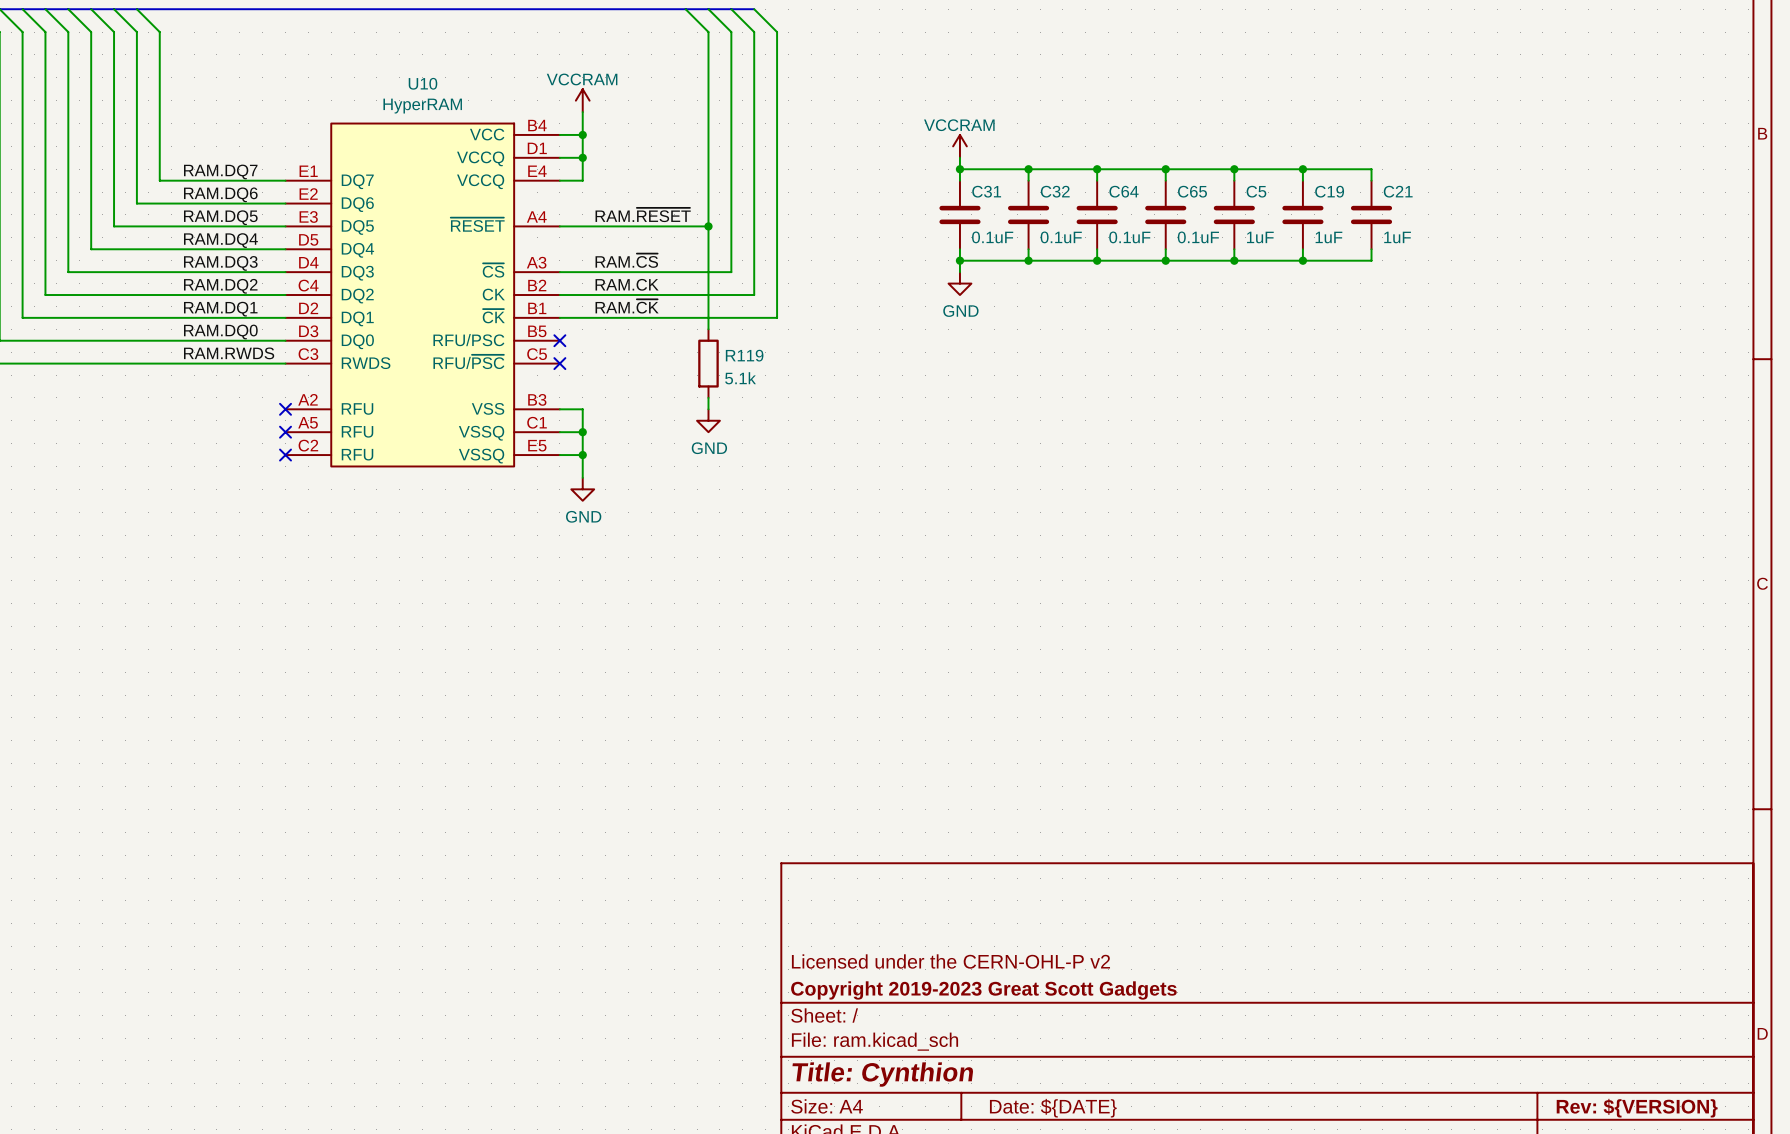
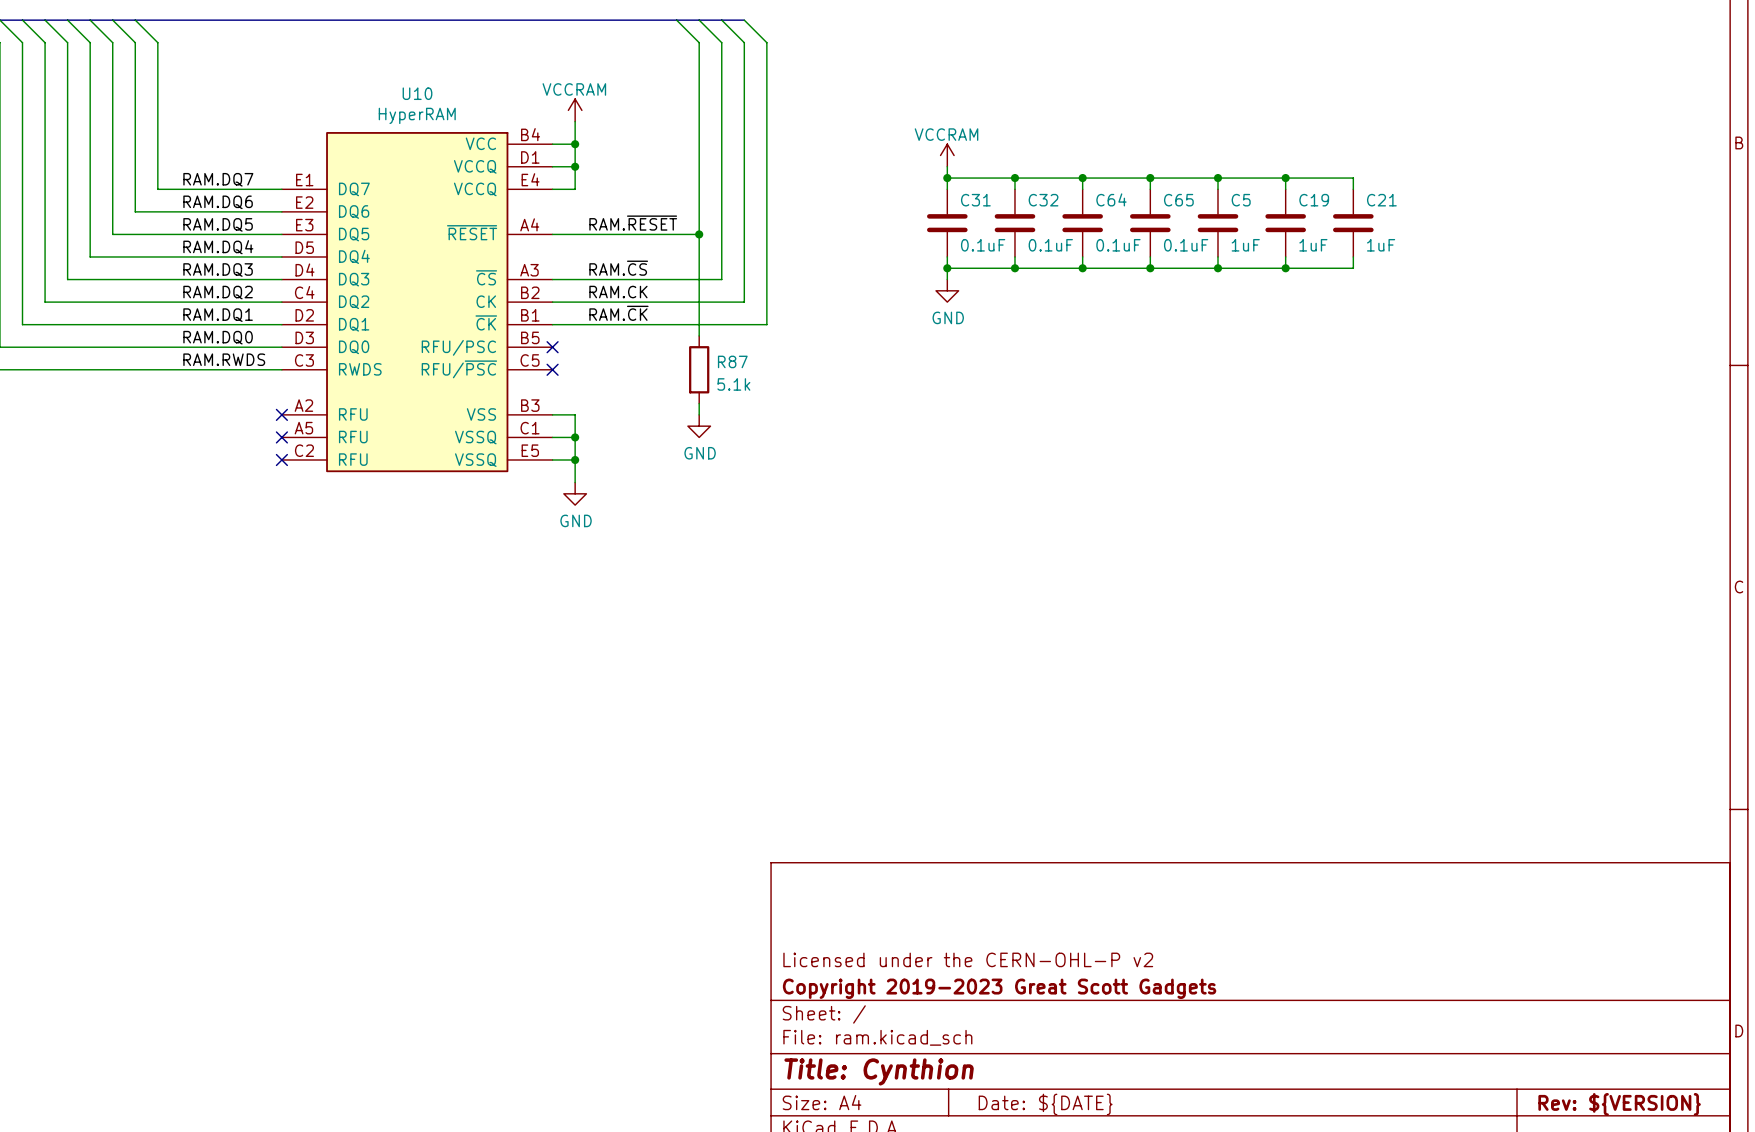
R119 name: R119 (744, 355) -> R87 (732, 361)

